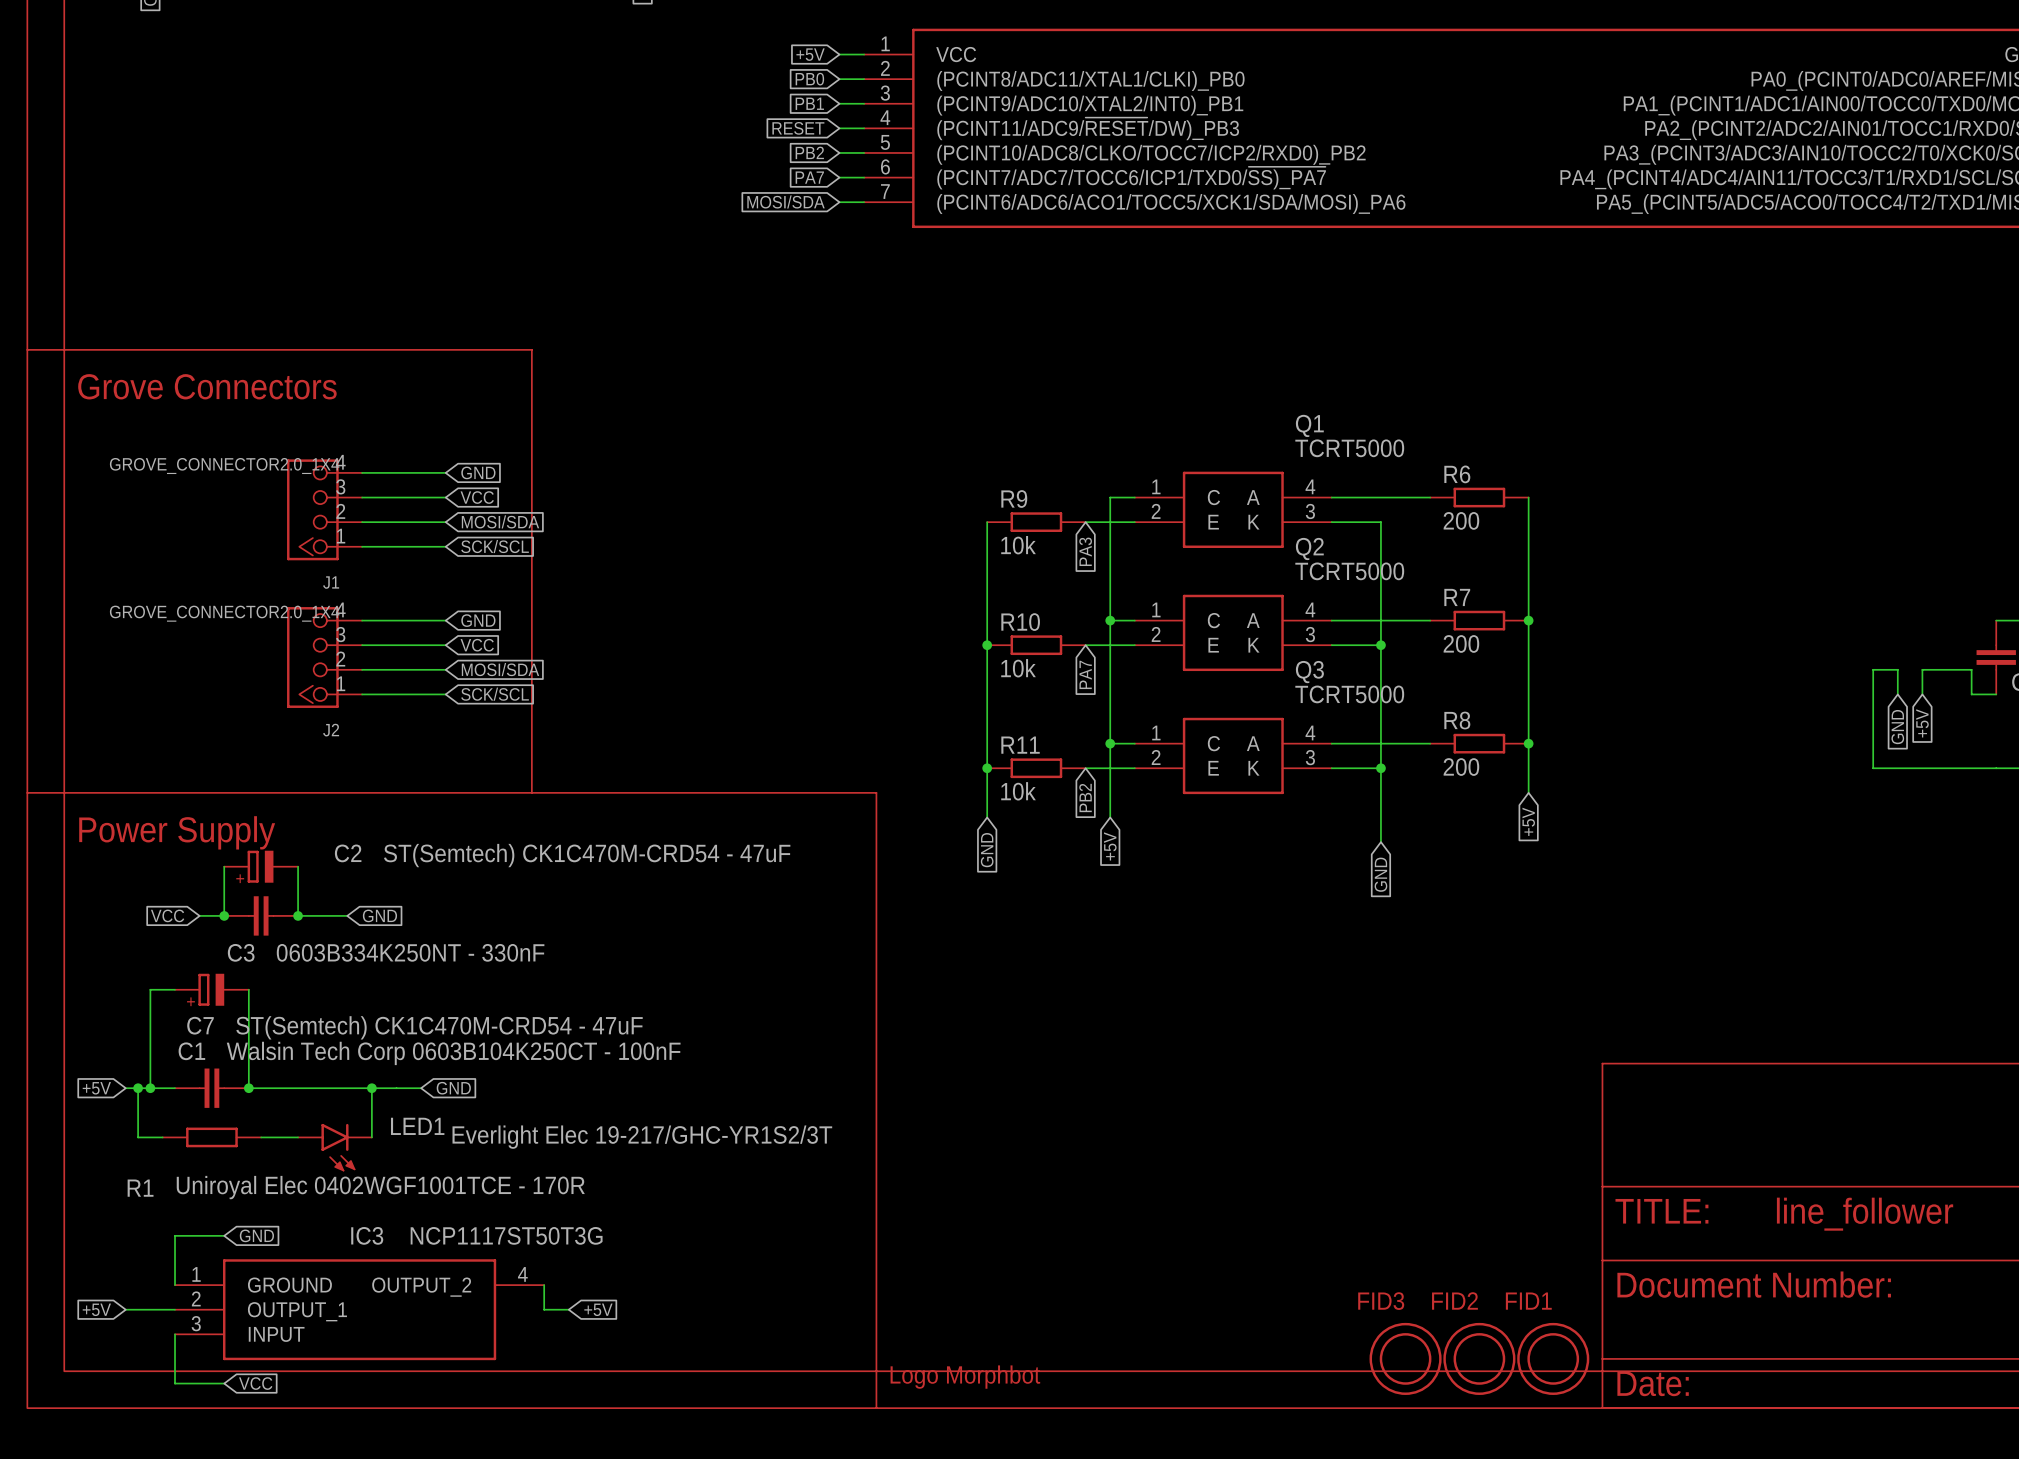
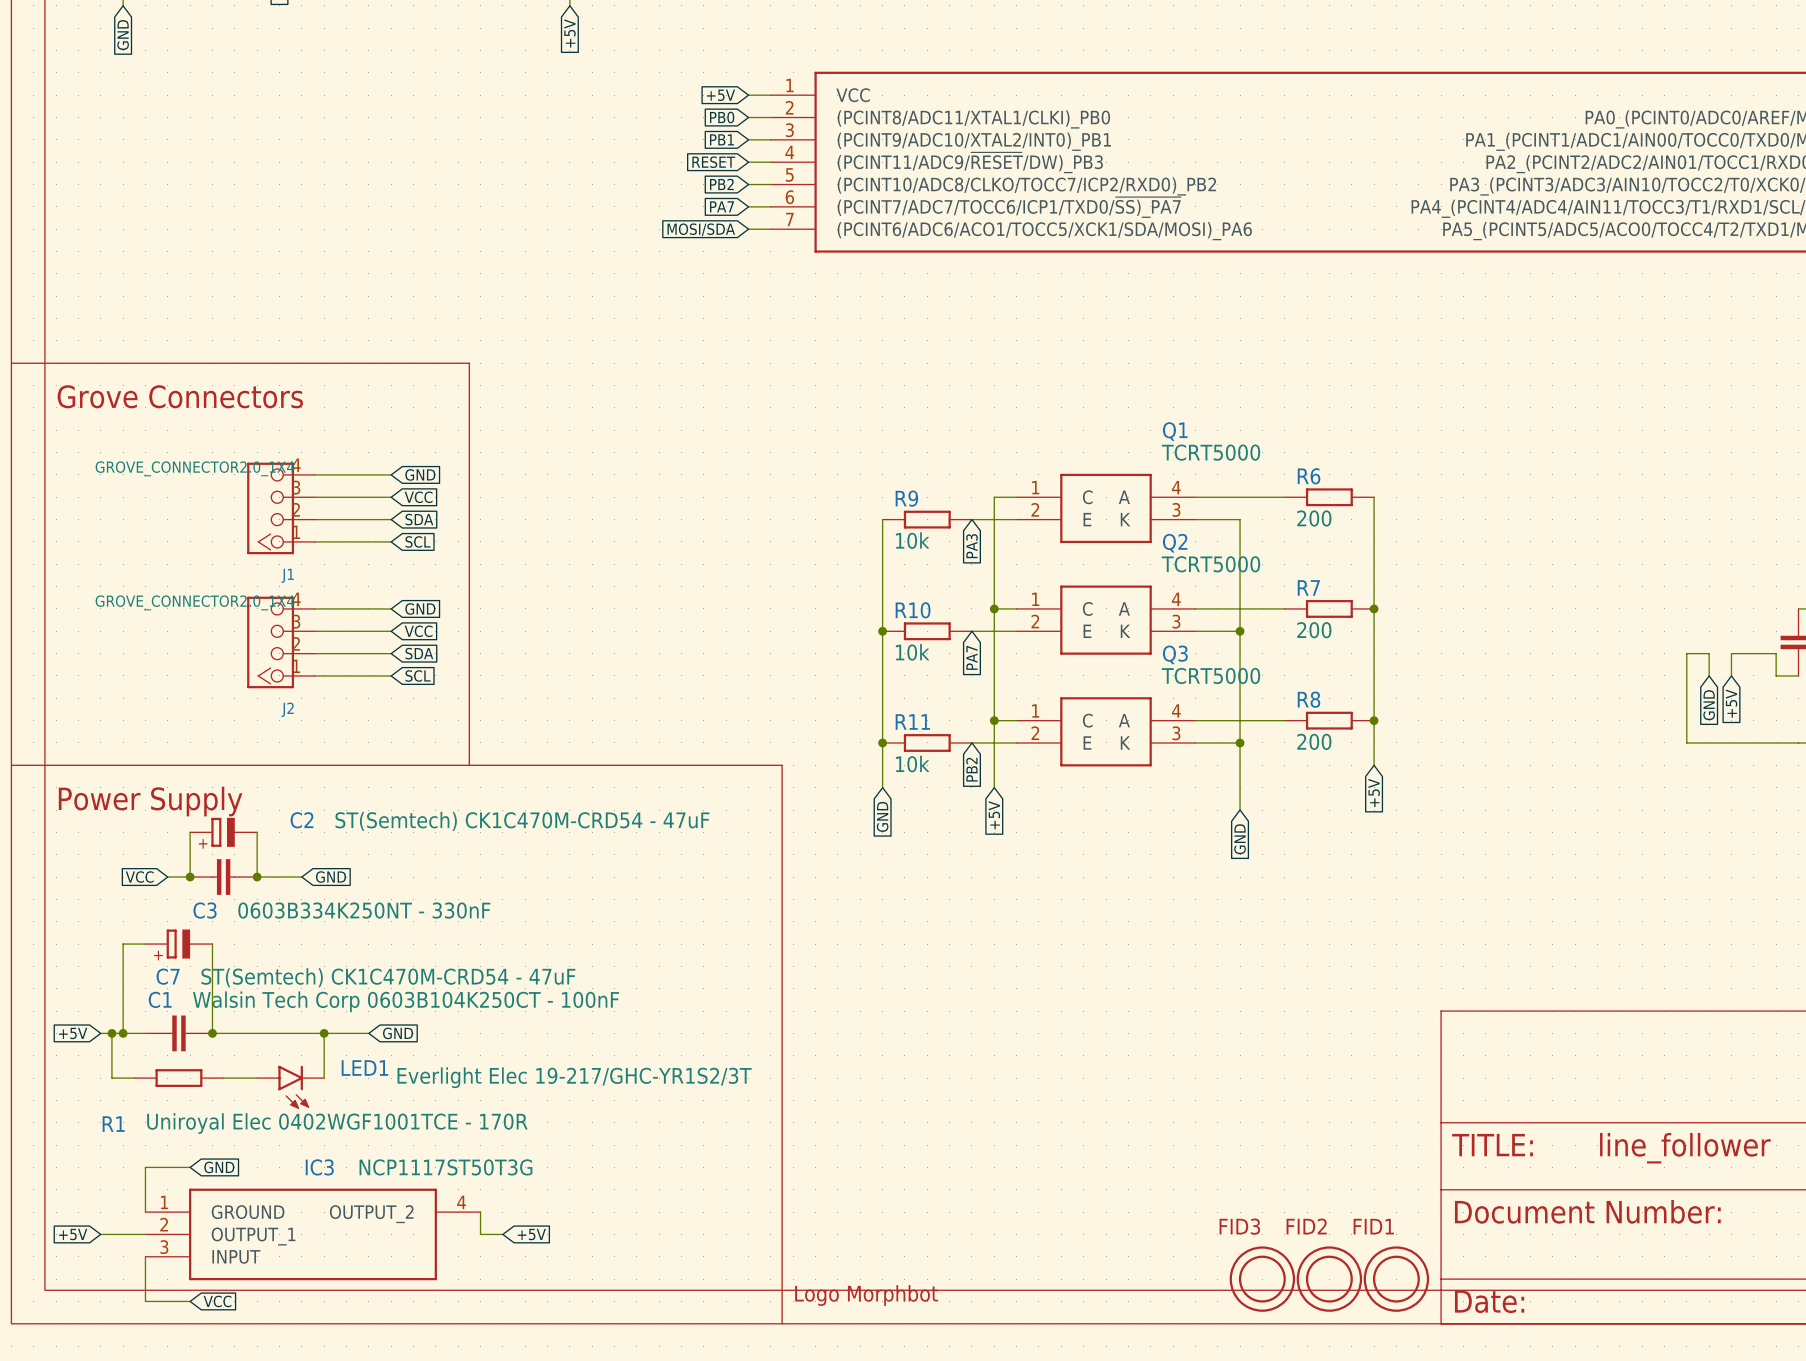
global label: MOSI/SDA (500, 521) -> SDA (419, 519)
global label: SCK/SCL (495, 546) -> SCL (418, 541)
global label: MOSI/SDA (500, 669) -> SDA (419, 653)
global label: SCK/SCL (495, 694) -> SCL (418, 675)

